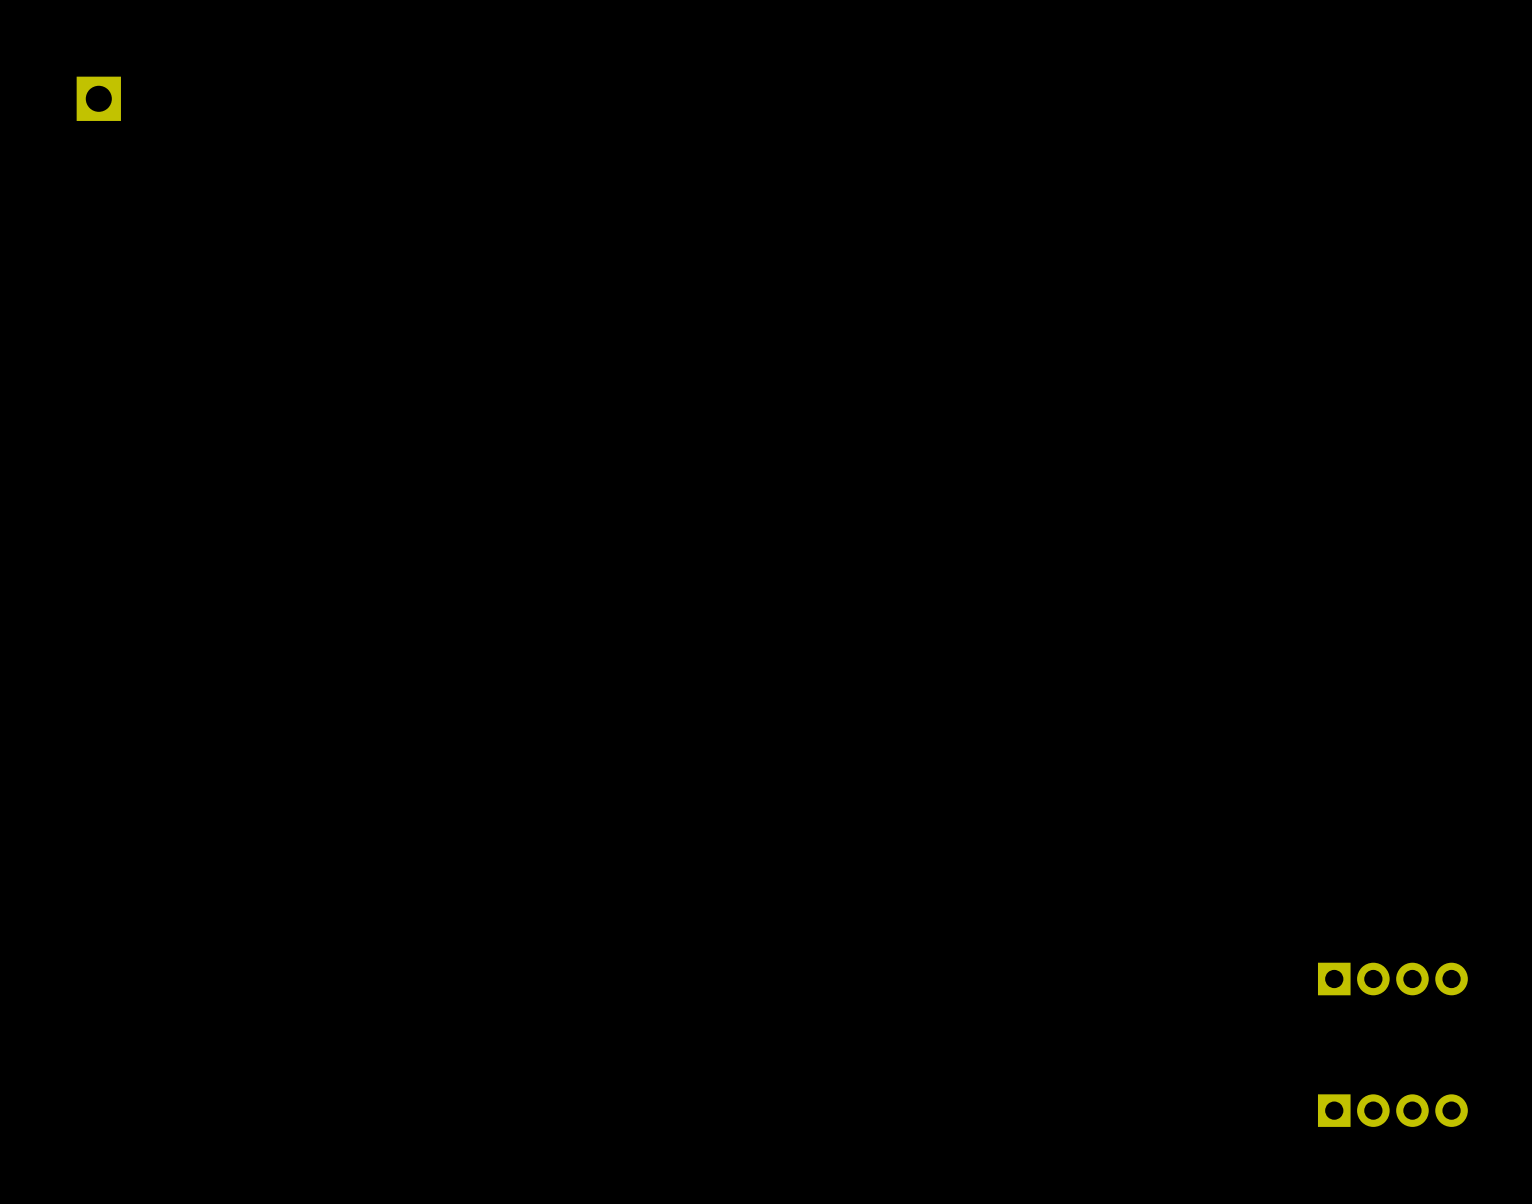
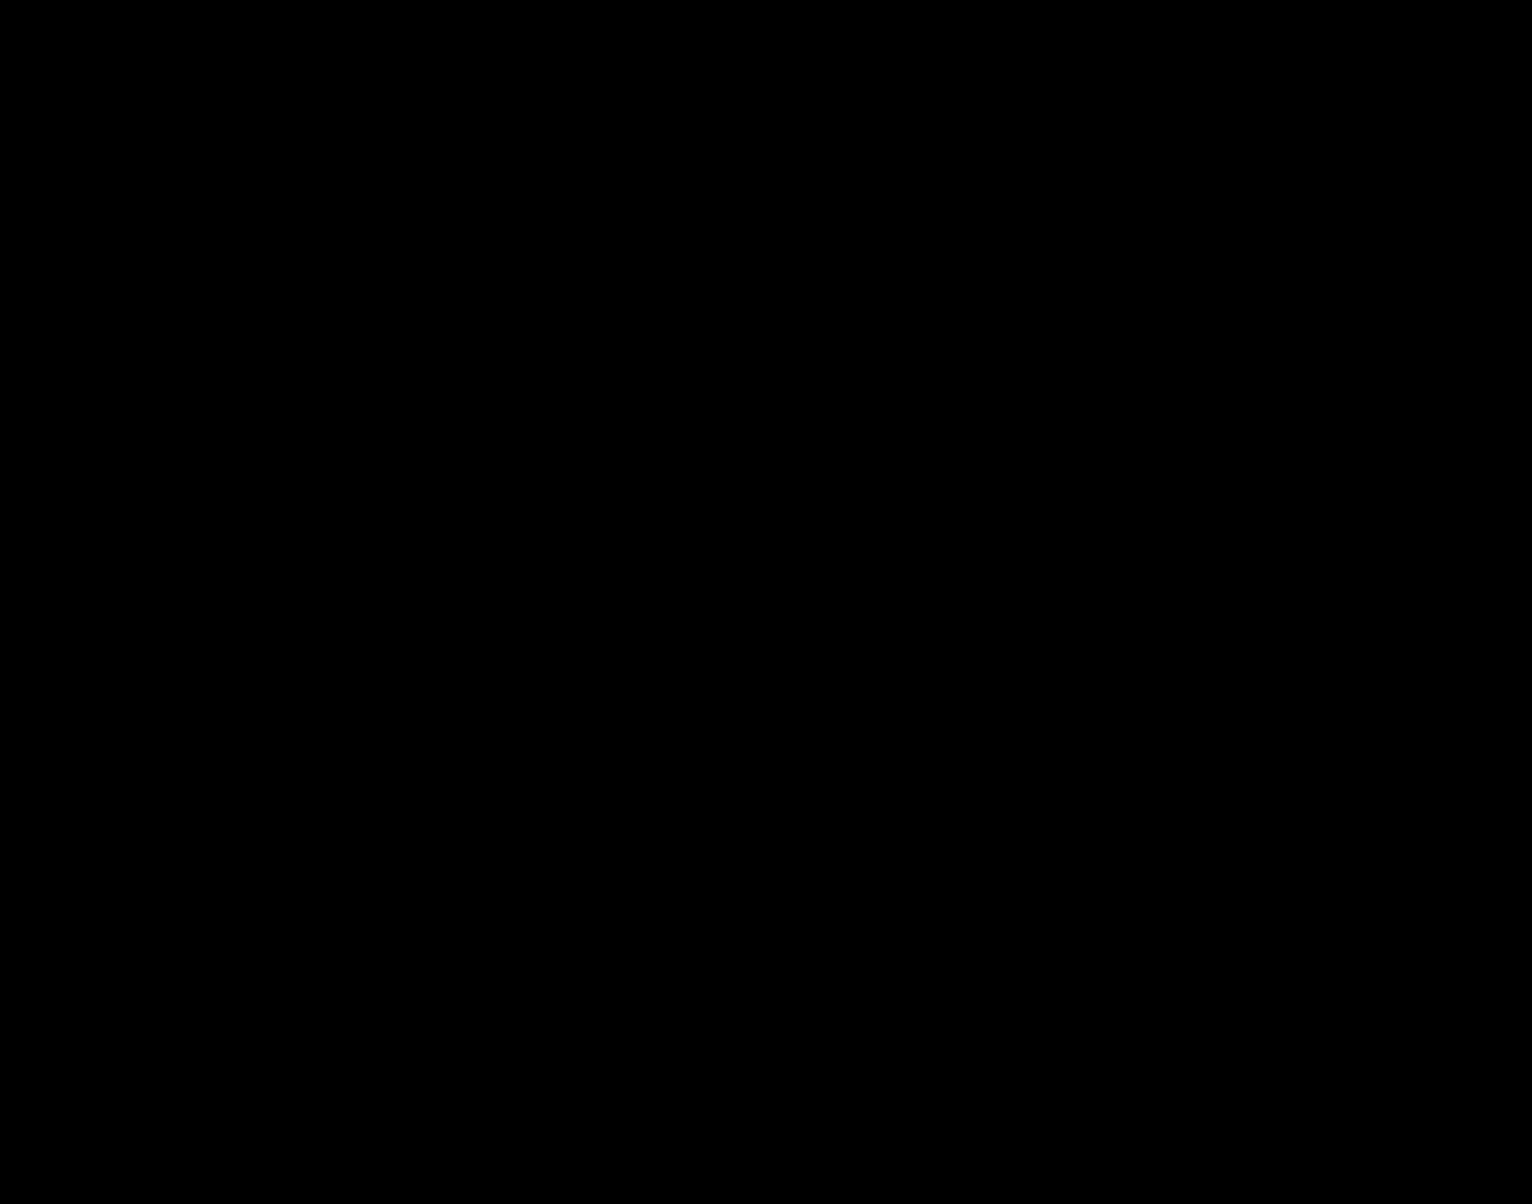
part: (98, 98) -> none
part: (1392, 979) -> none
part: (1392, 1110) -> none

